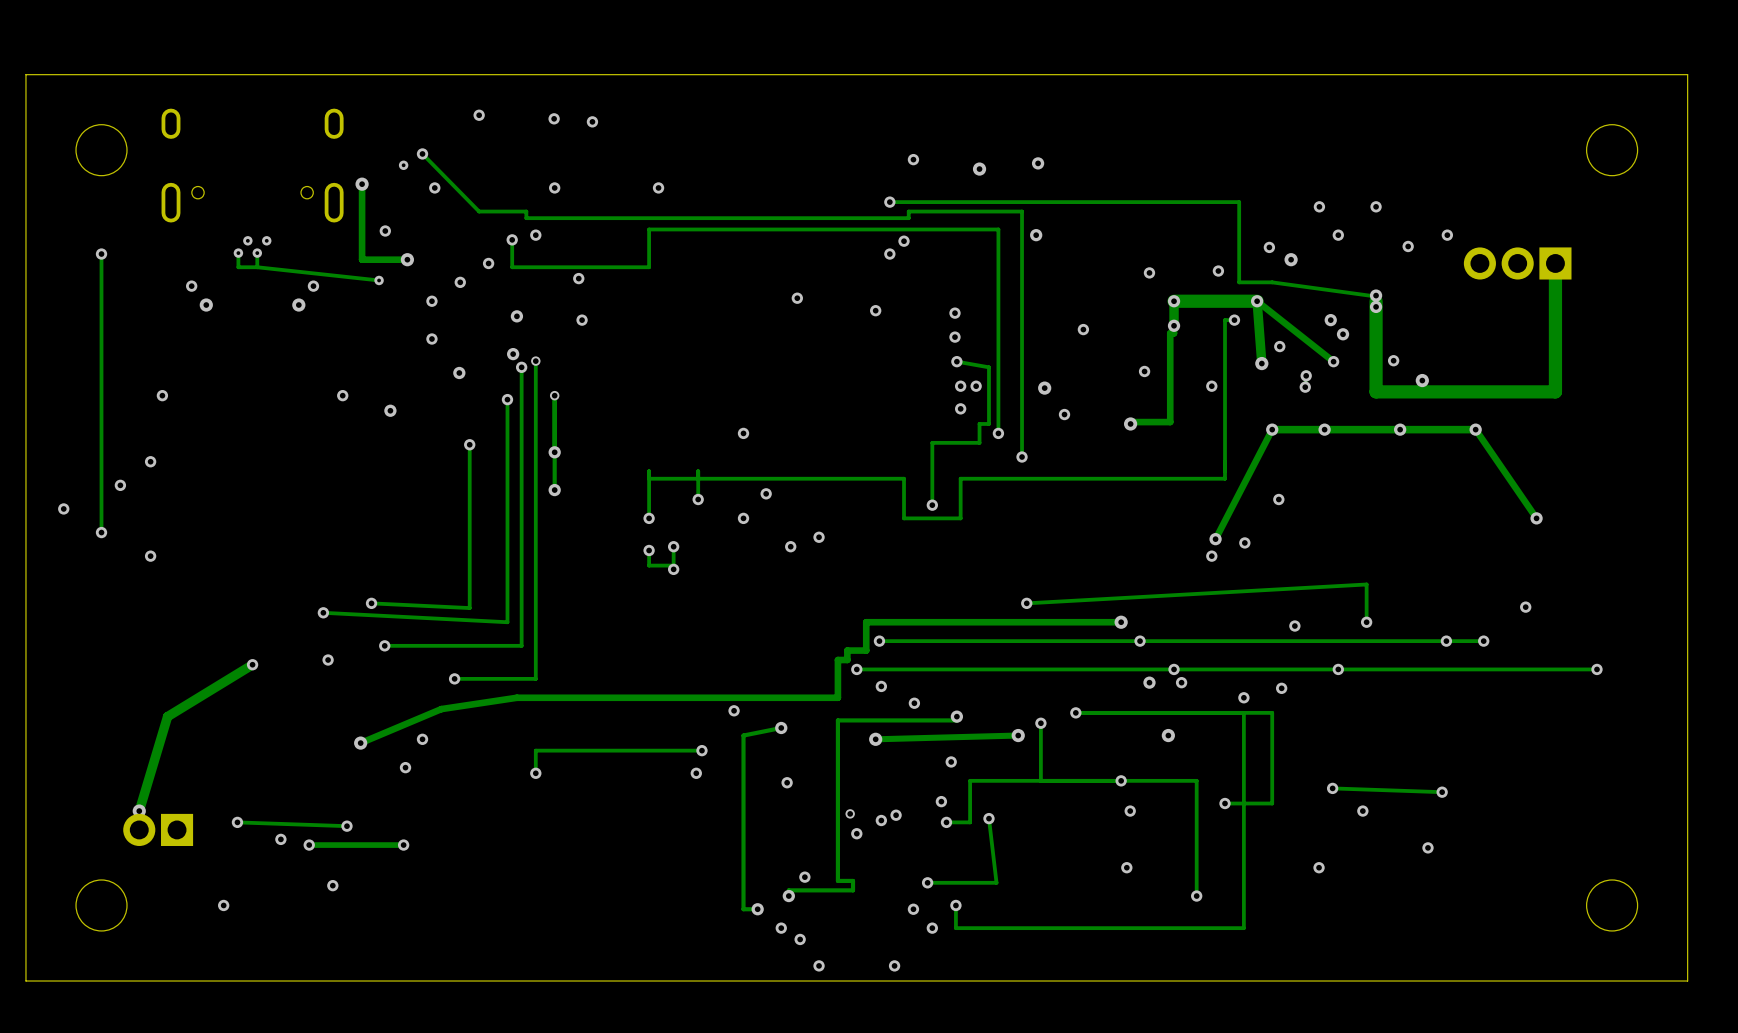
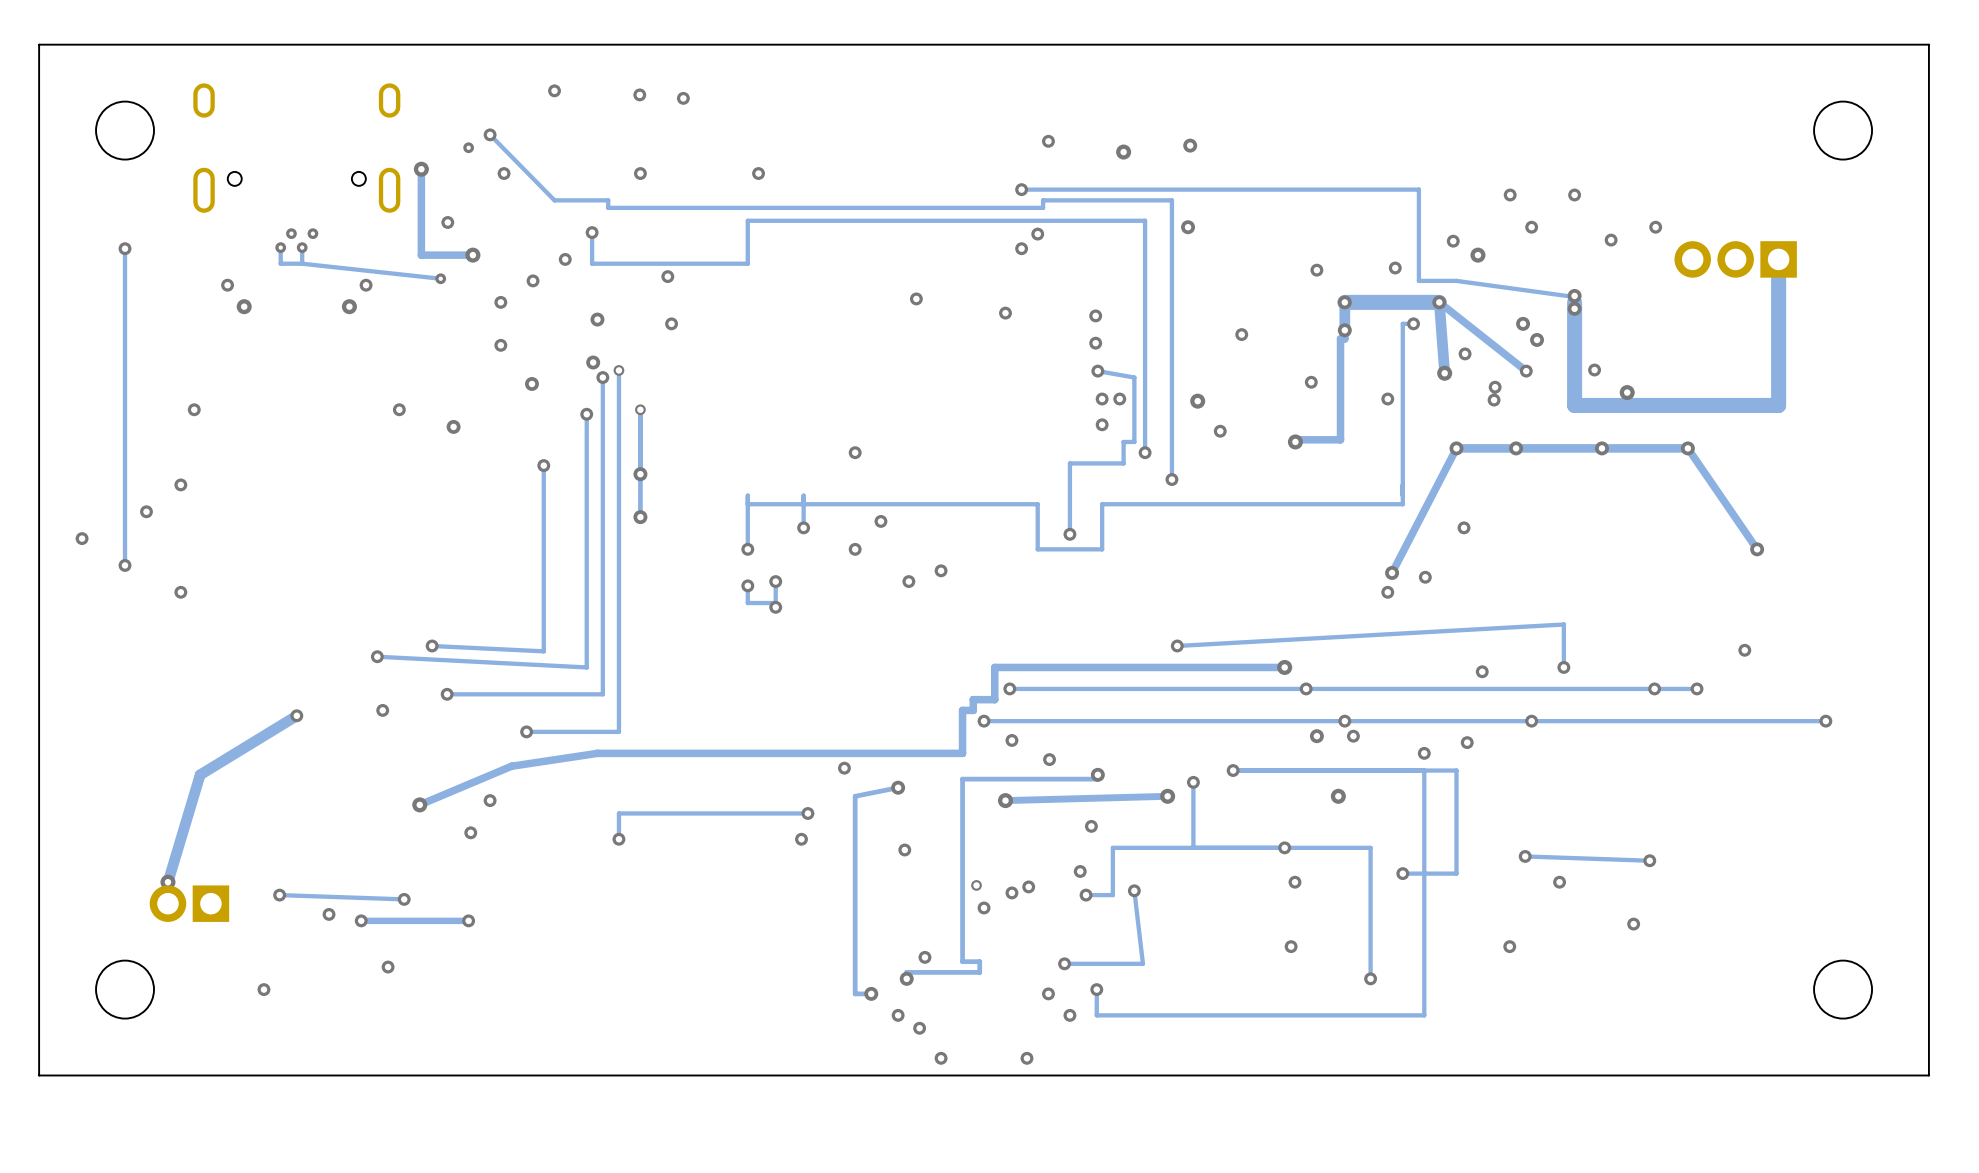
via: (535, 235) -> none

